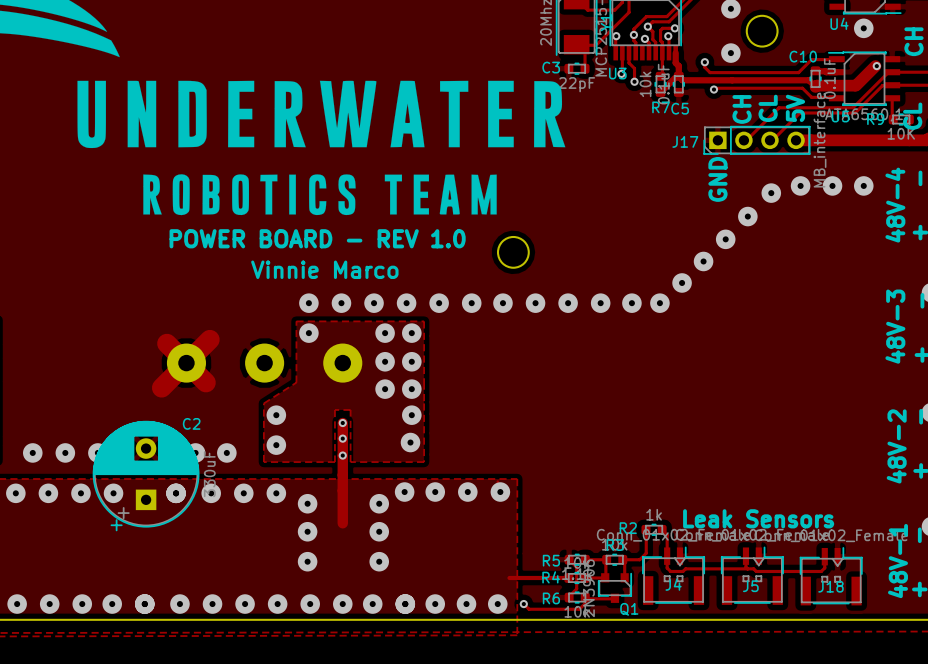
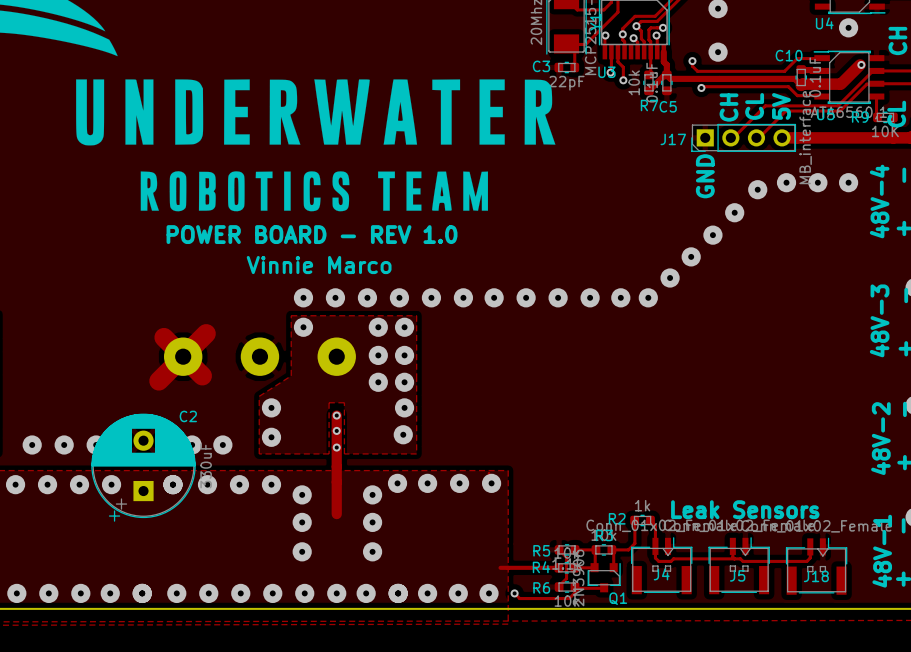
round board edge: [745, 14, 779, 48] -> none
round board edge: [496, 235, 530, 269] -> none

